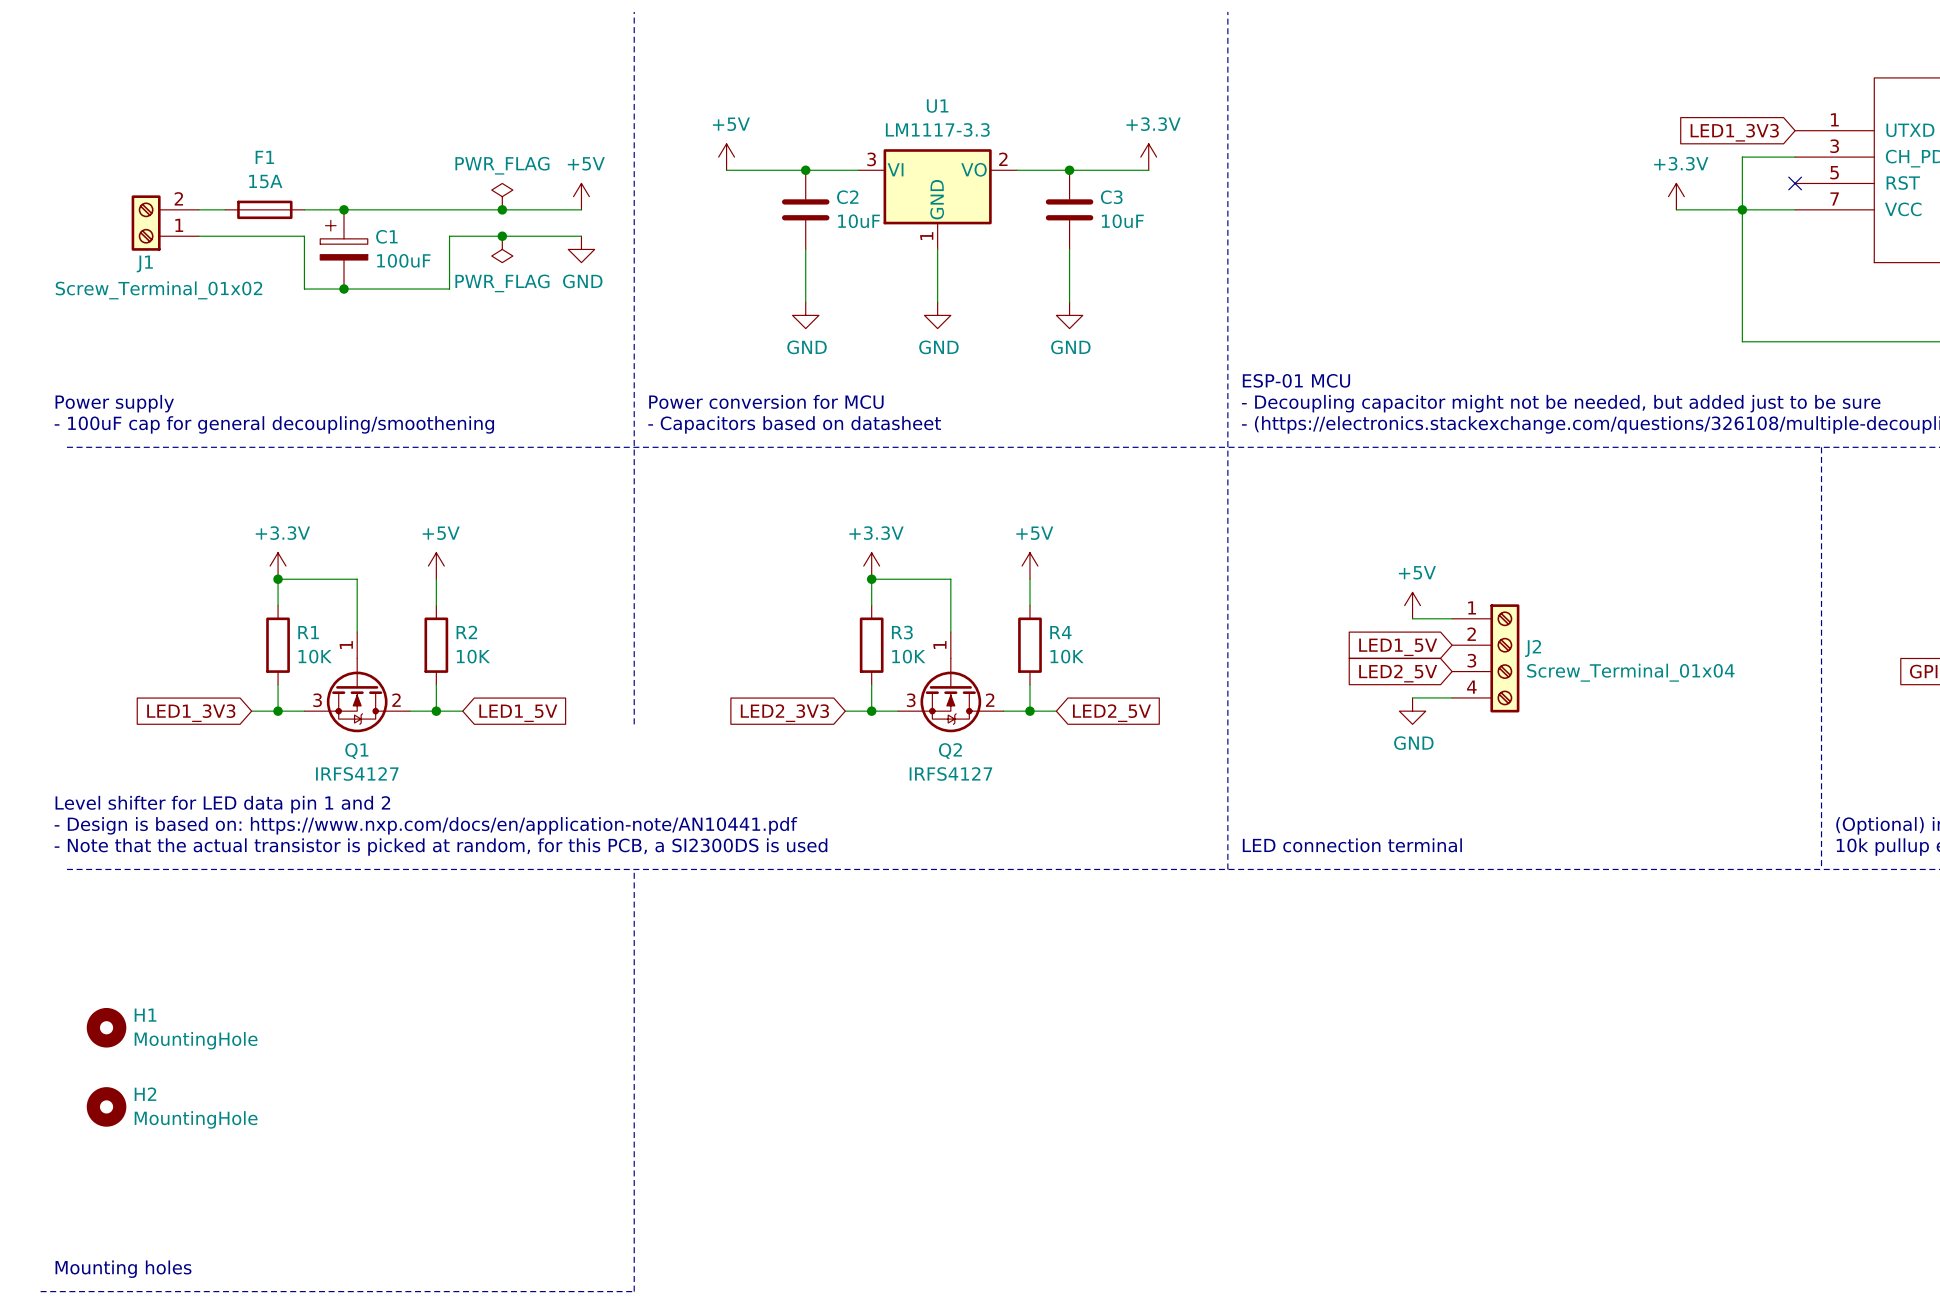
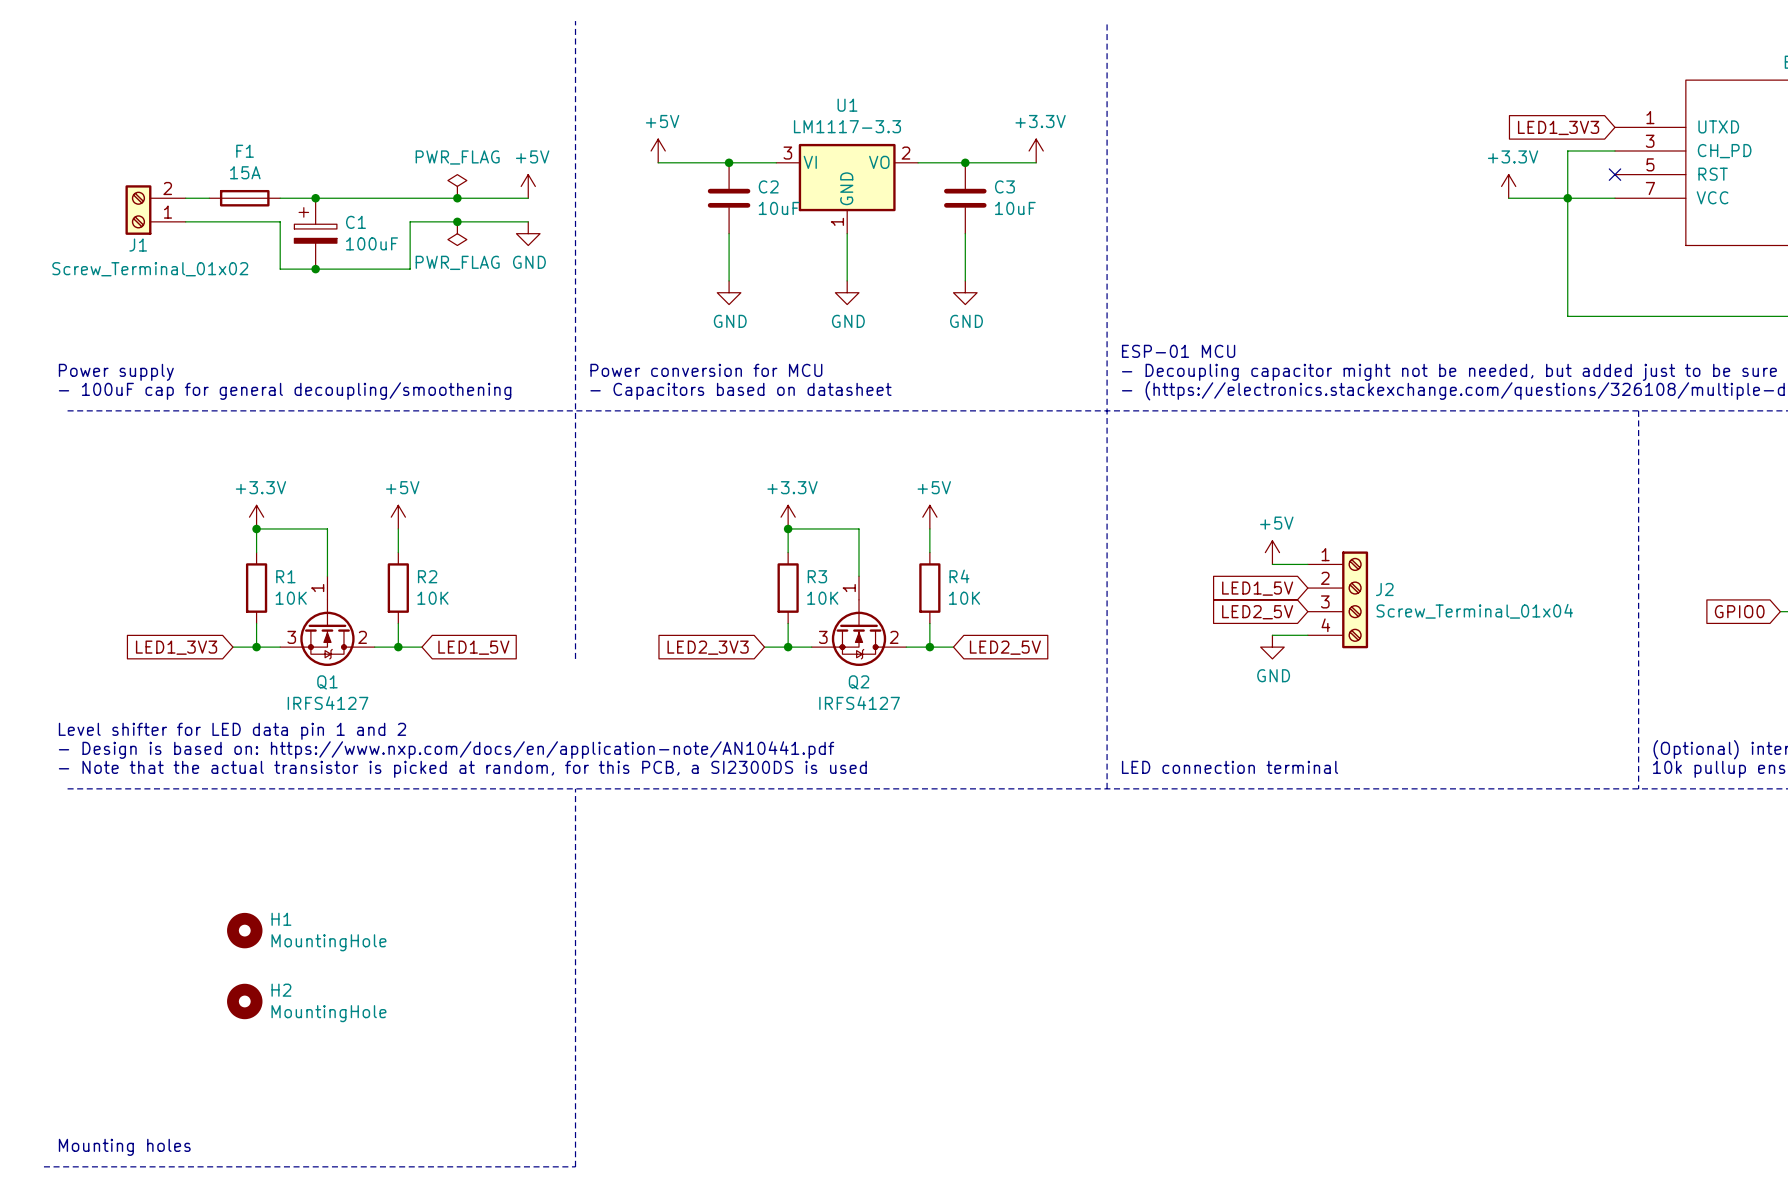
H1 position: (106, 1027) -> (244, 930)
H2 position: (106, 1106) -> (244, 1001)

